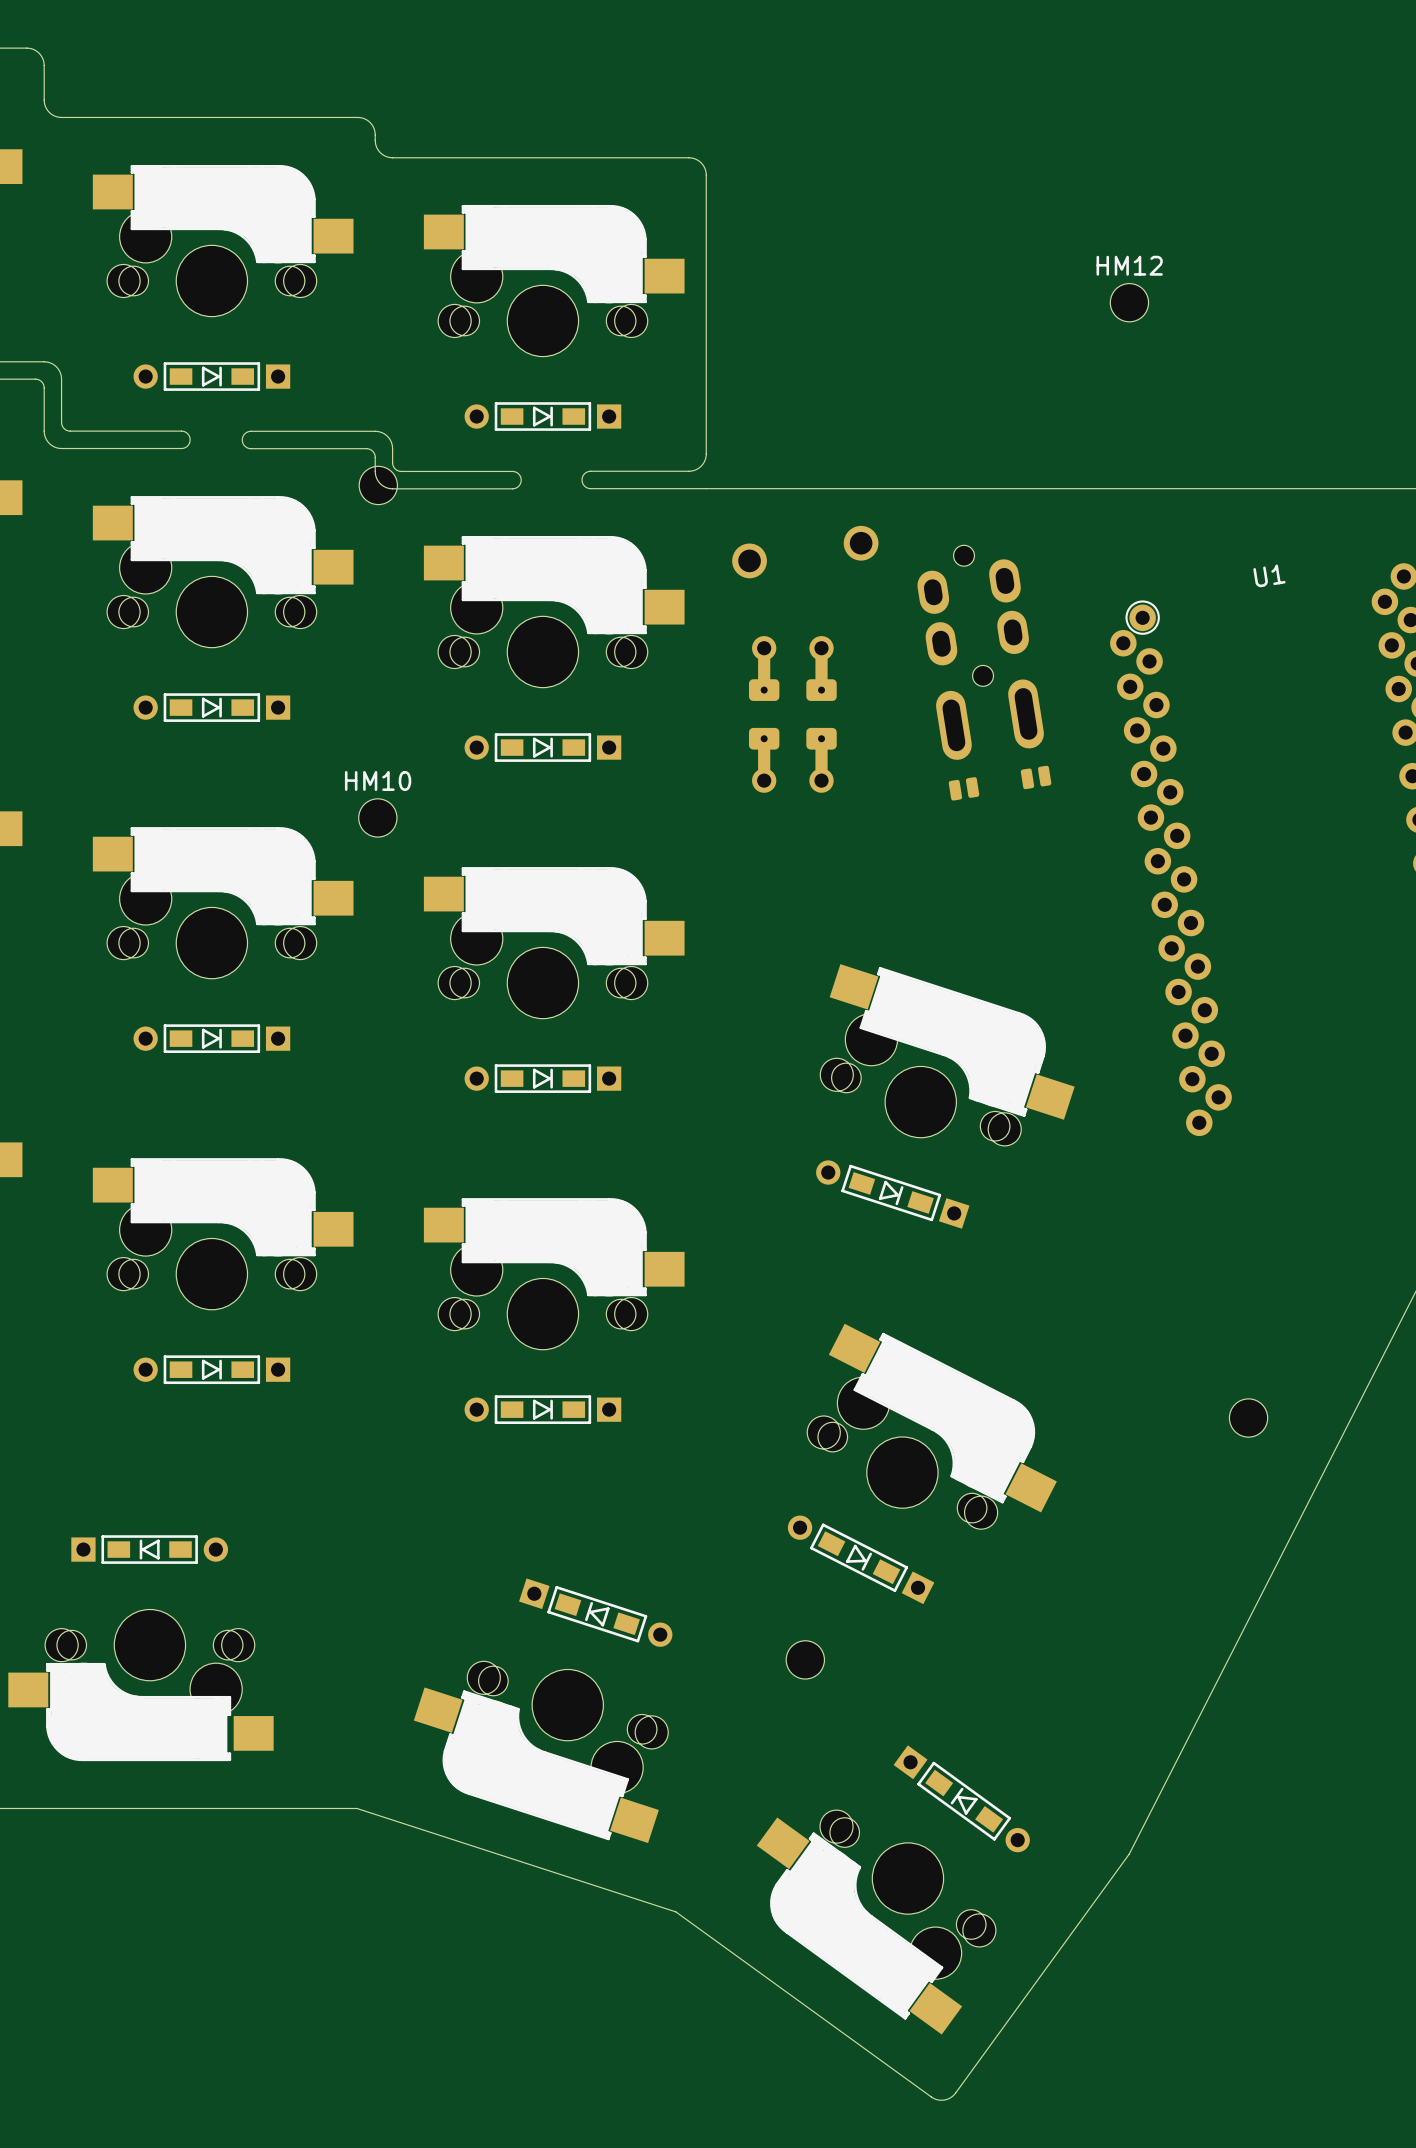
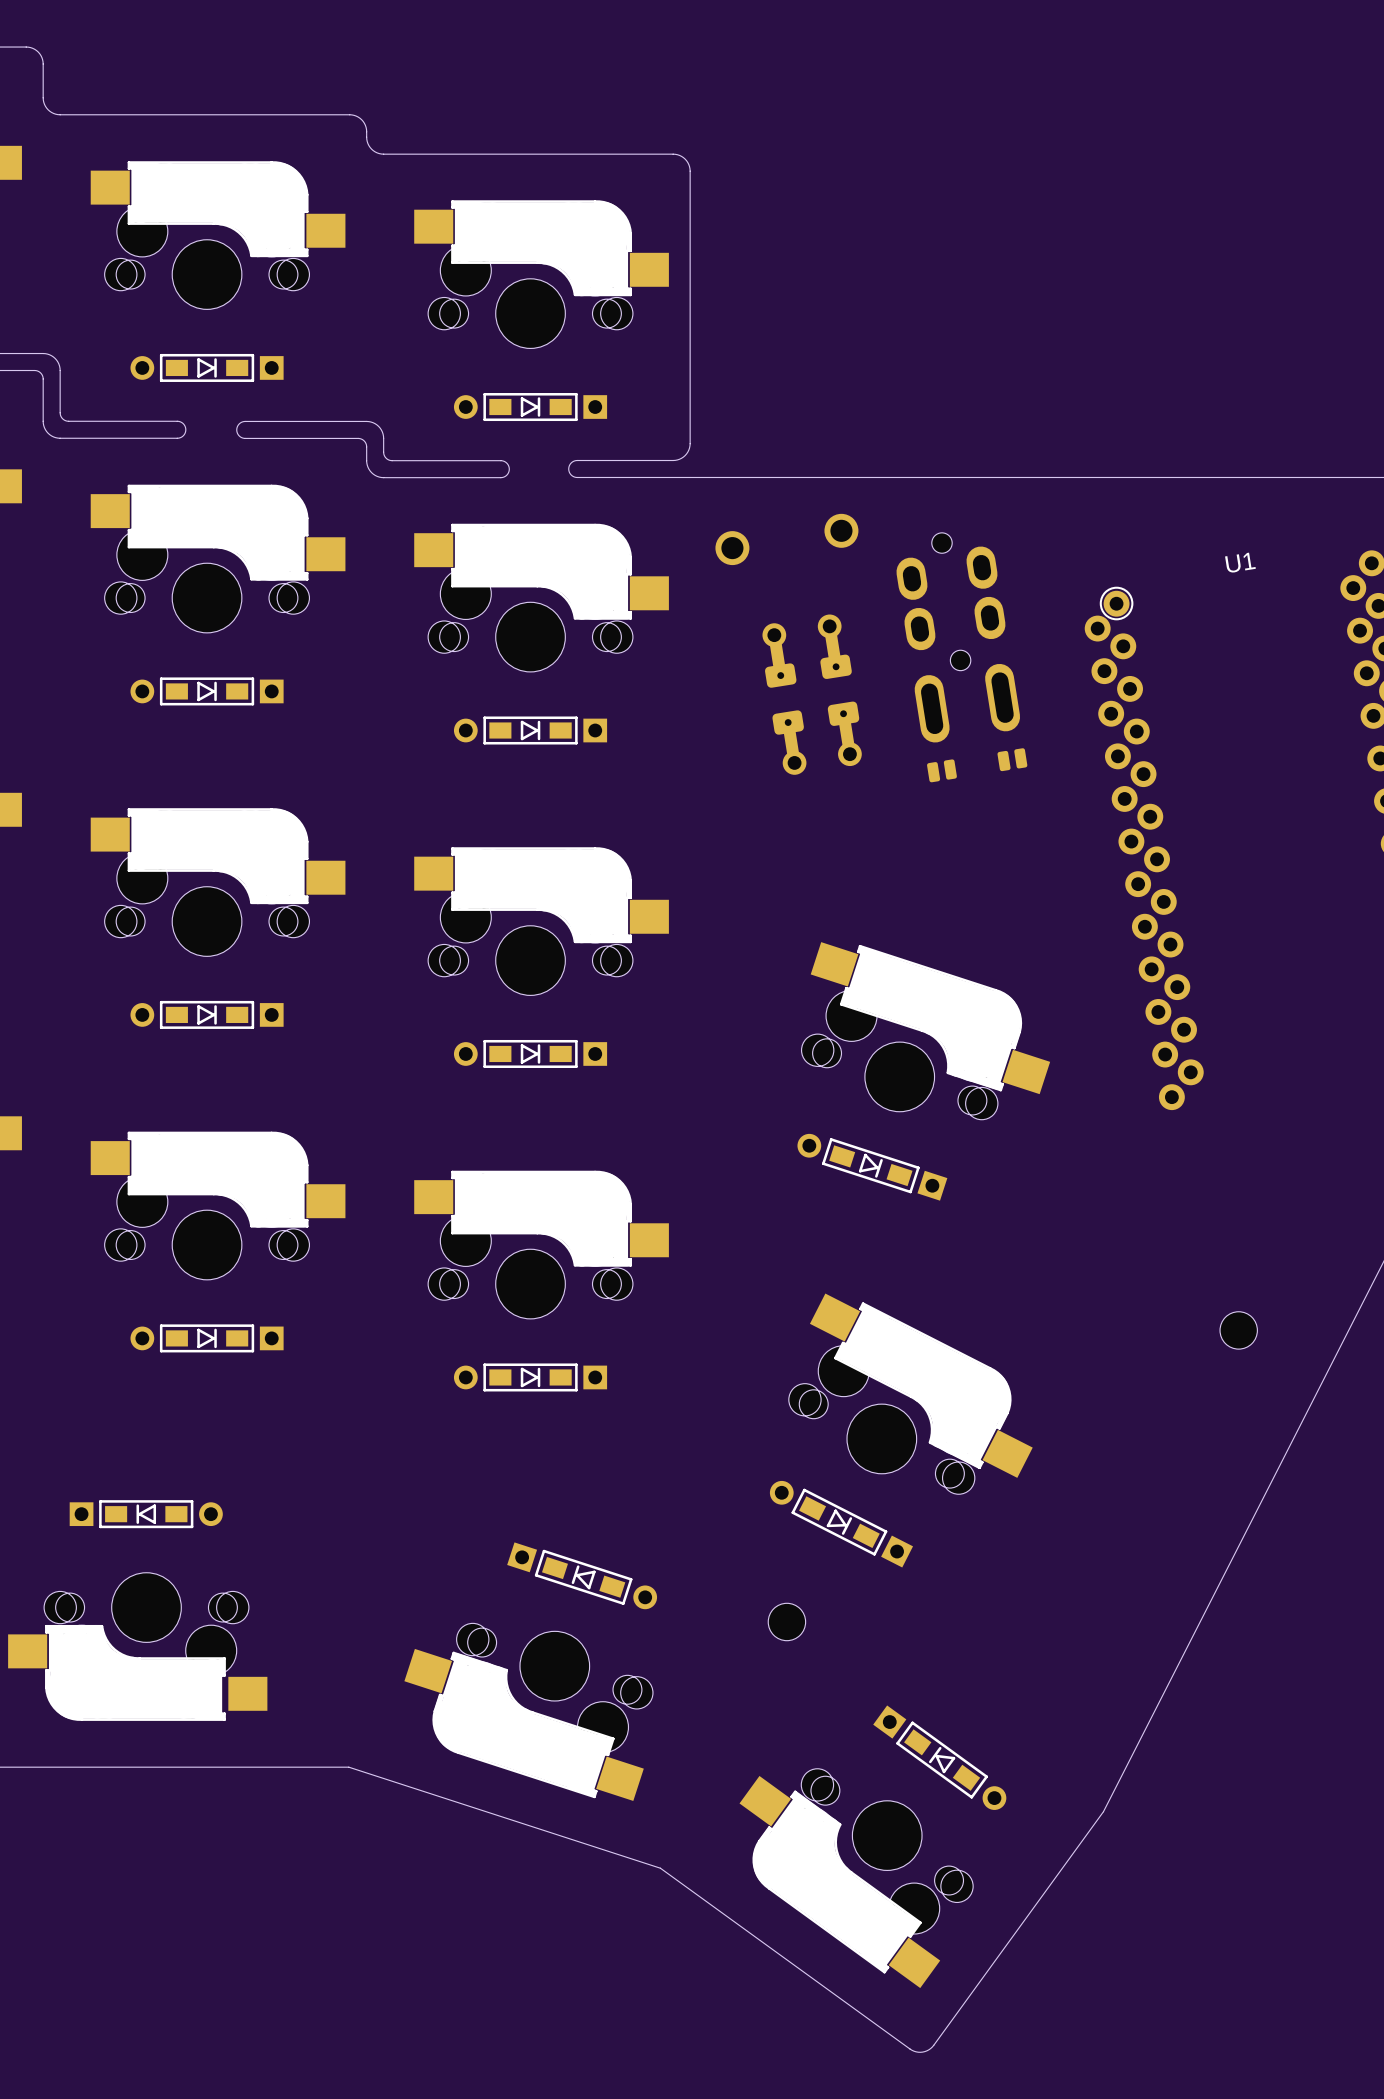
HM12: (1129, 302) -> none
part: (378, 485) -> none
part: none -> (839, 690)
part: (764, 714) -> none
part: (821, 714) -> none
part: none -> (784, 699)
HM10: (377, 817) -> none
part position: (1248, 1418) -> (1238, 1330)

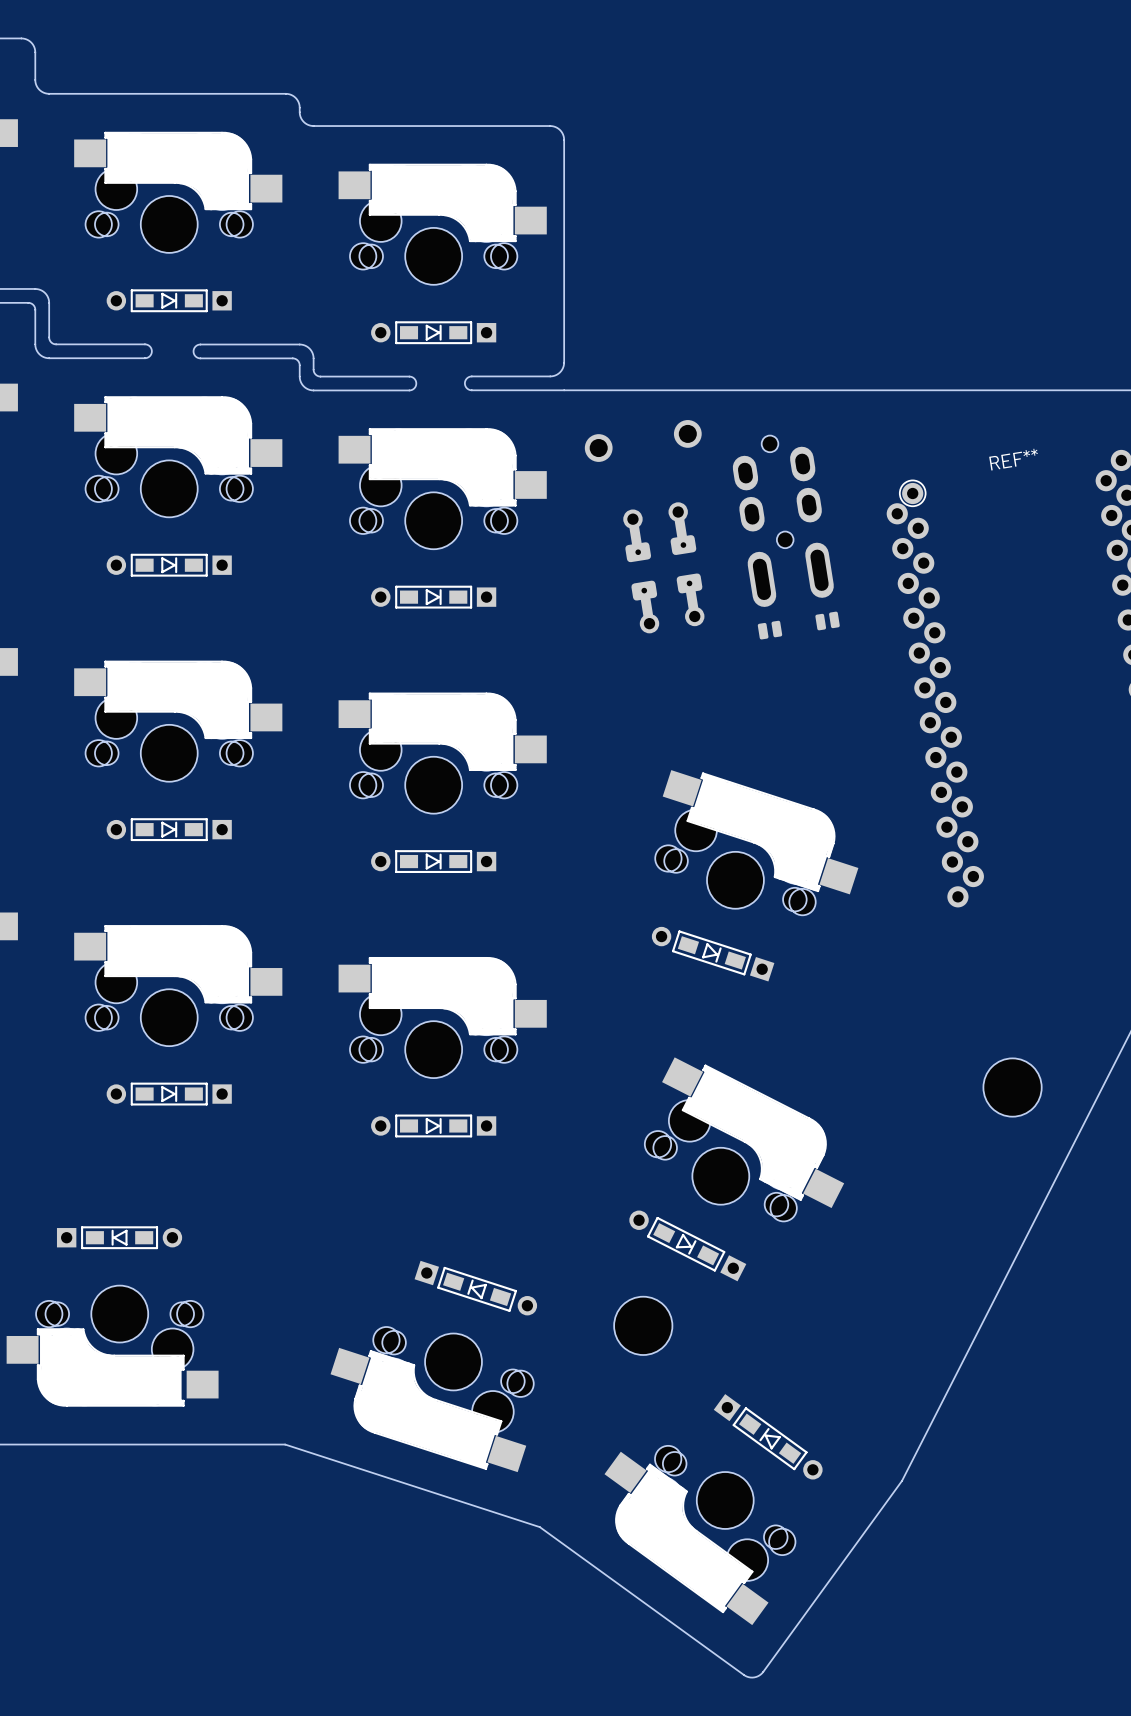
U1 name: U1 (1240, 562) -> REF** (1013, 459)
part footprint: [1220, 1311, 1258, 1350] -> [983, 1058, 1042, 1117]
part footprint: [768, 1603, 806, 1641] -> [614, 1296, 673, 1356]

